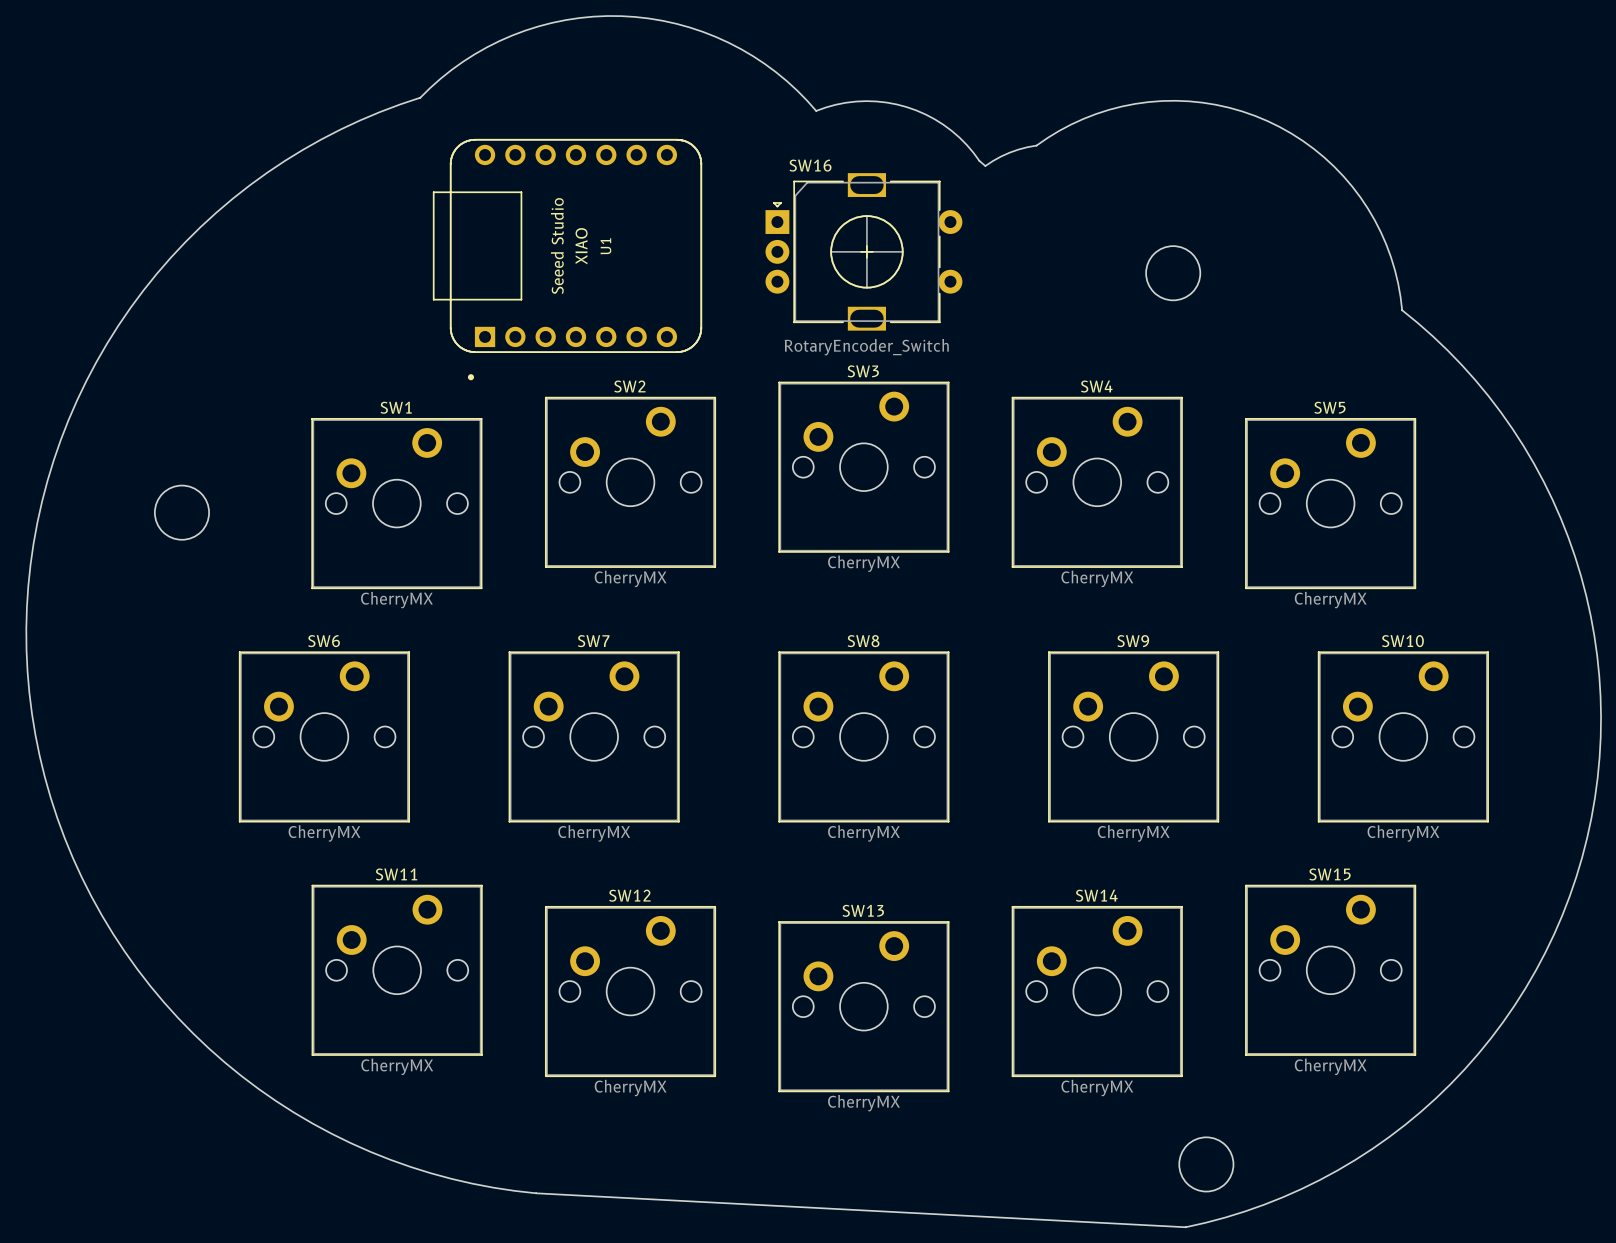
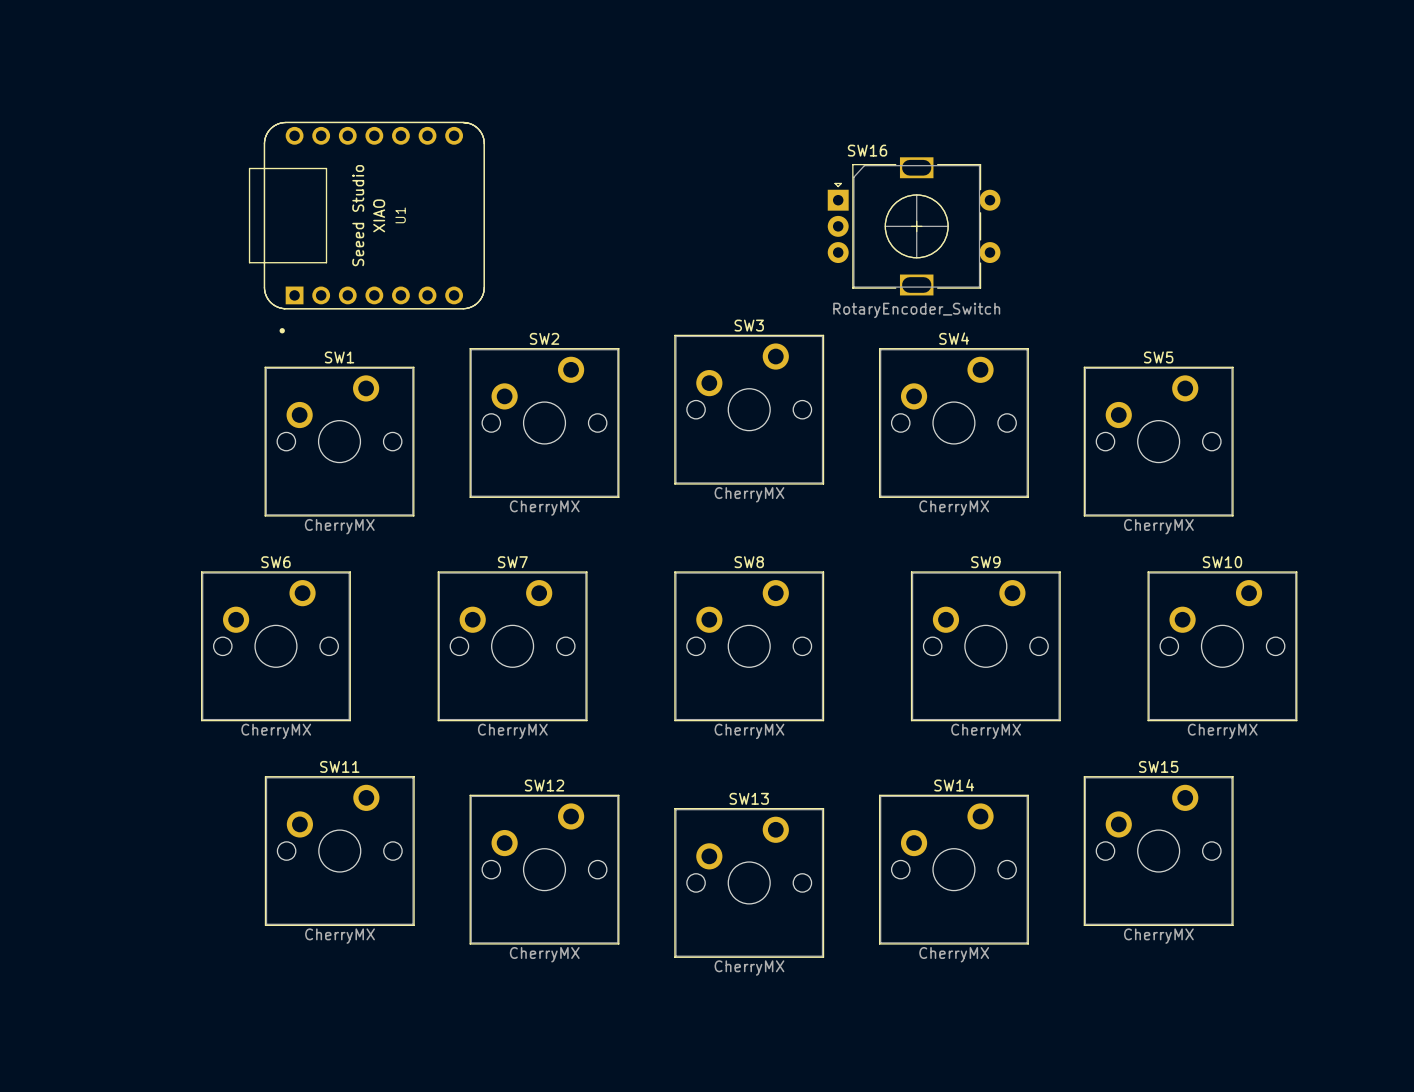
board edge: (420, 97) (451, 69) (474, 54) (525, 30) (579, 18) (635, 16) (689, 27) (741, 49) (776, 72) (816, 110) (845, 102) (866, 101) (896, 104) (916, 110) (934, 119) (951, 130) (985, 166) (1009, 152) (1036, 145) (1059, 130) (1096, 114) (1135, 103) (1175, 100) (1216, 104) (1255, 115) (1279, 126) (1302, 140) (1334, 166) (1360, 197) (1380, 232) (1395, 270) (1402, 310) (1447, 350) (1475, 380) (1512, 429) (1534, 463) (1560, 518) (1575, 556) (1586, 595) (1594, 635) (1600, 696) (1599, 757) (1591, 818) (1576, 877) (1562, 915) (1535, 970) (1503, 1022) (1464, 1069) (1435, 1098) (1405, 1124) (1372, 1148) (1337, 1170) (1301, 1189) (1263, 1204) (1225, 1217) (1185, 1227) (536, 1193) (493, 1187) (431, 1173) (390, 1159) (350, 1143) (312, 1123) (276, 1101) (241, 1076) (208, 1048) (164, 1002) (137, 969) (112, 933) (81, 877) (64, 838) (50, 797) (35, 735) (29, 692) (26, 650) (28, 585) (37, 522) (47, 480) (60, 440) (86, 381) (118, 325) (143, 290) (170, 257) (216, 212) (249, 185) (284, 160) (321, 139) (360, 120) (420, 97) -> none
round board edge: [1145, 245, 1201, 301] -> none
SW16 position: (863, 251) -> (914, 226)
U1 position: (567, 259) -> (366, 227)
round board edge: [154, 484, 210, 541] -> none
round board edge: [1178, 1136, 1235, 1193] -> none

